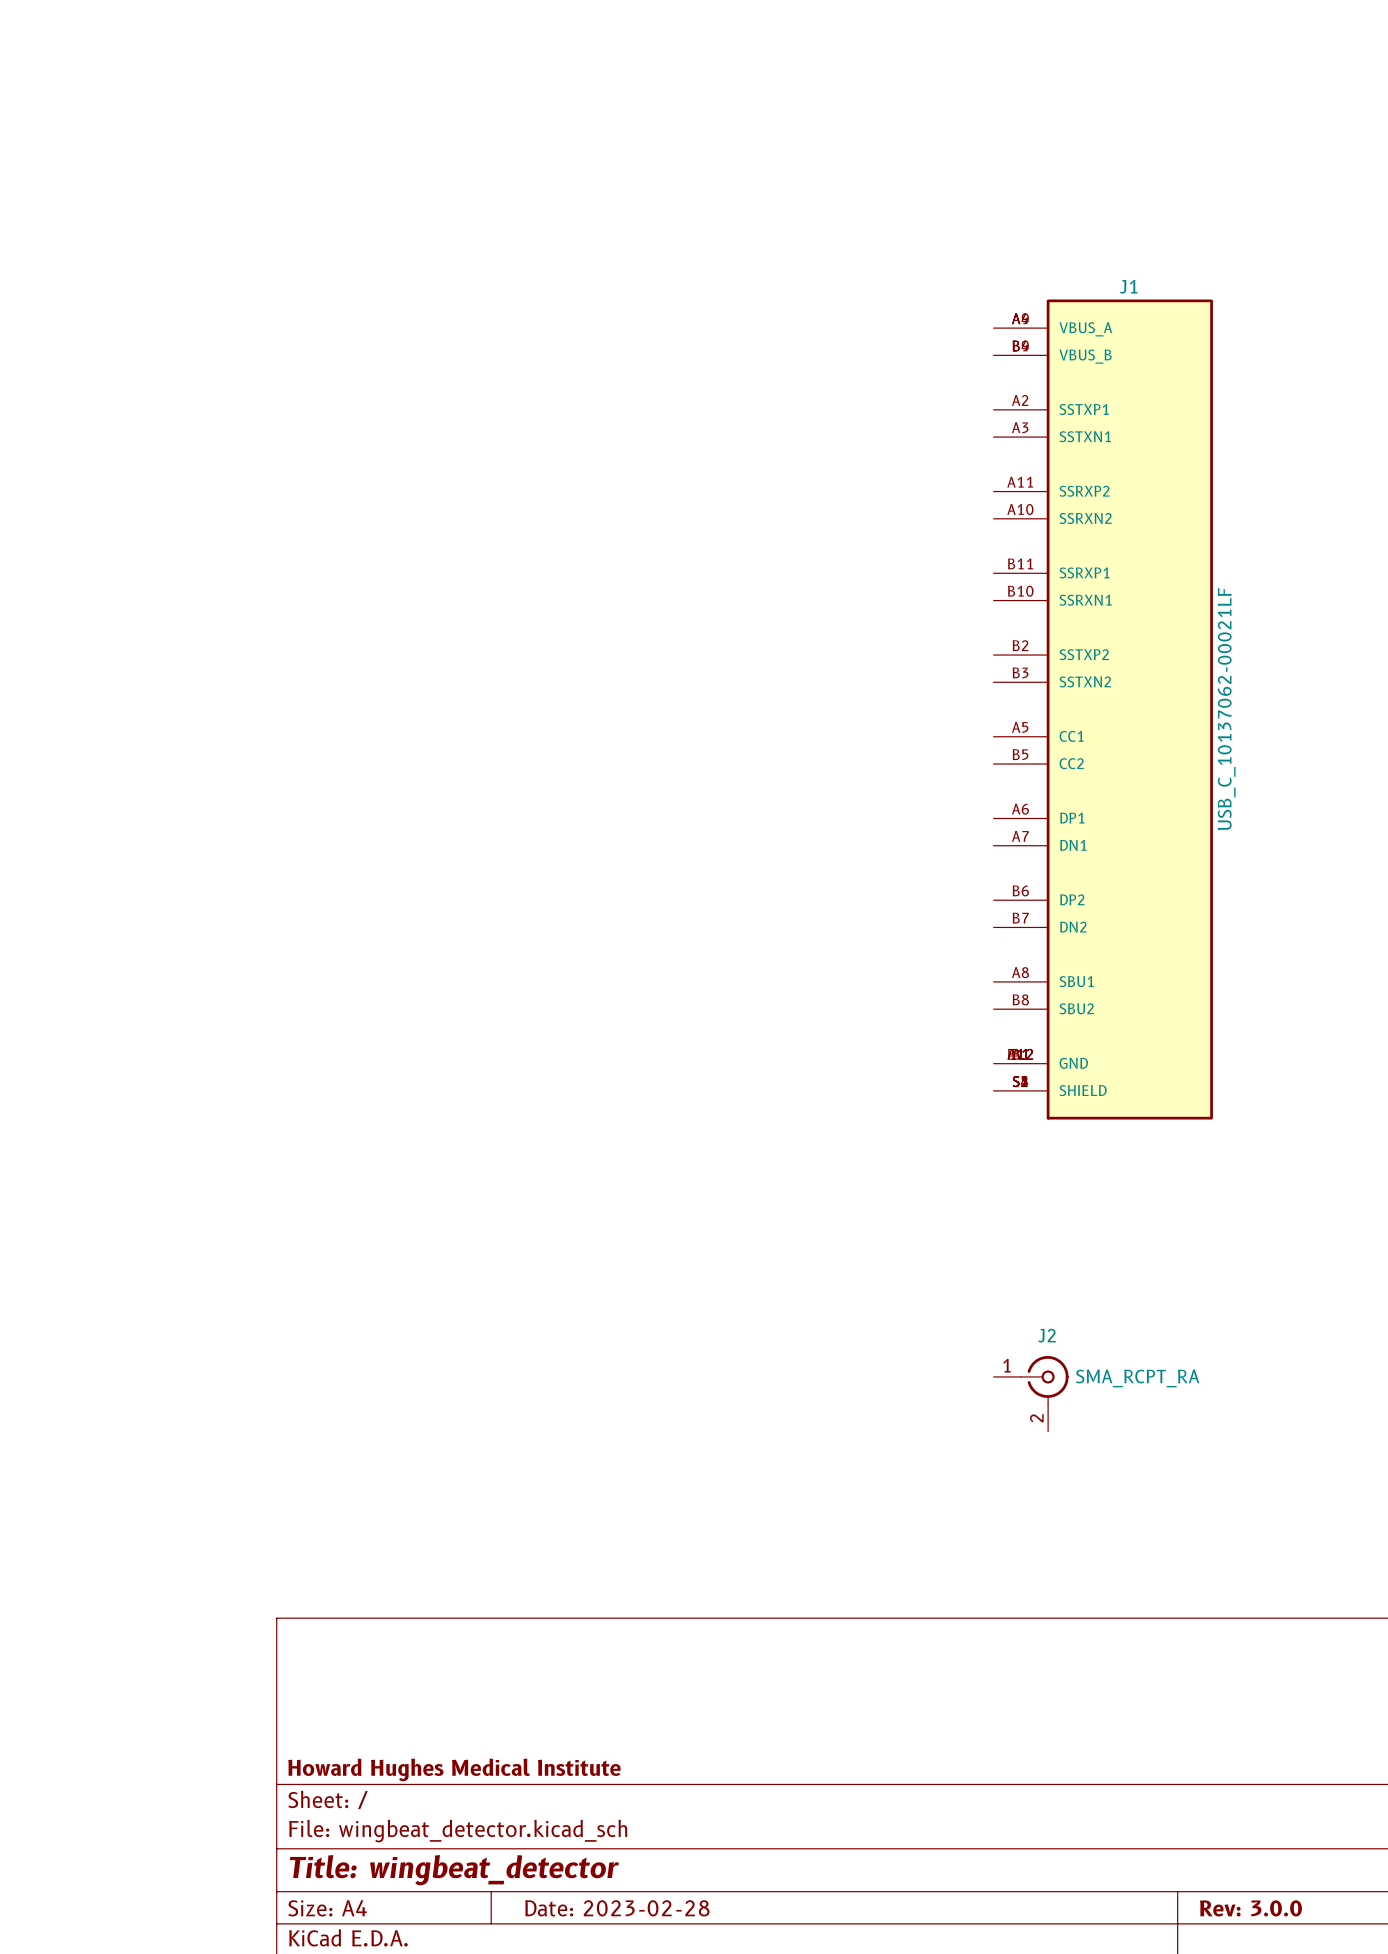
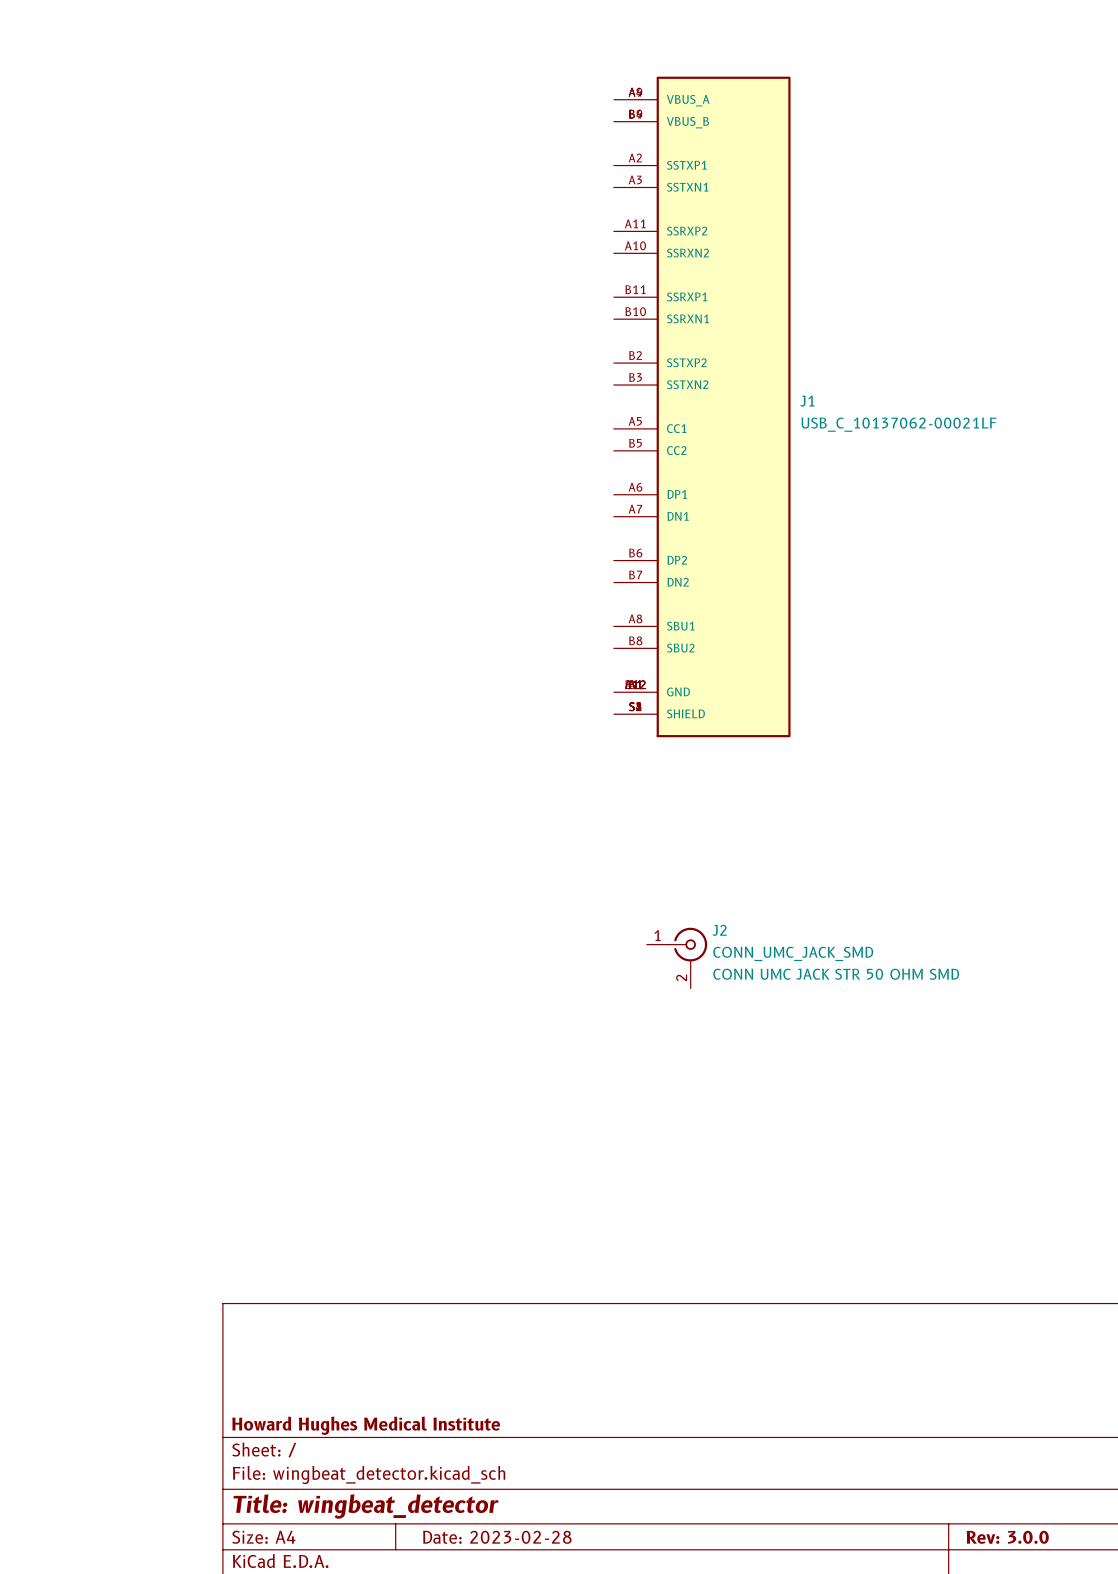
J1 name position: J1 (1128, 286) -> J1 (807, 401)
J1 position: (1103, 709) -> (702, 406)
J1 value rotation: 0° (1226, 709) -> 90° clockwise (898, 424)
J2 text: none -> CONN UMC JACK STR 50 OHM SMD (836, 974)
J2 name position: J2 (1047, 1335) -> J2 (719, 930)
J2 value: SMA_RCPT_RA (1137, 1378) -> CONN_UMC_JACK_SMD (793, 953)
J2 position: (1031, 1393) -> (676, 958)

